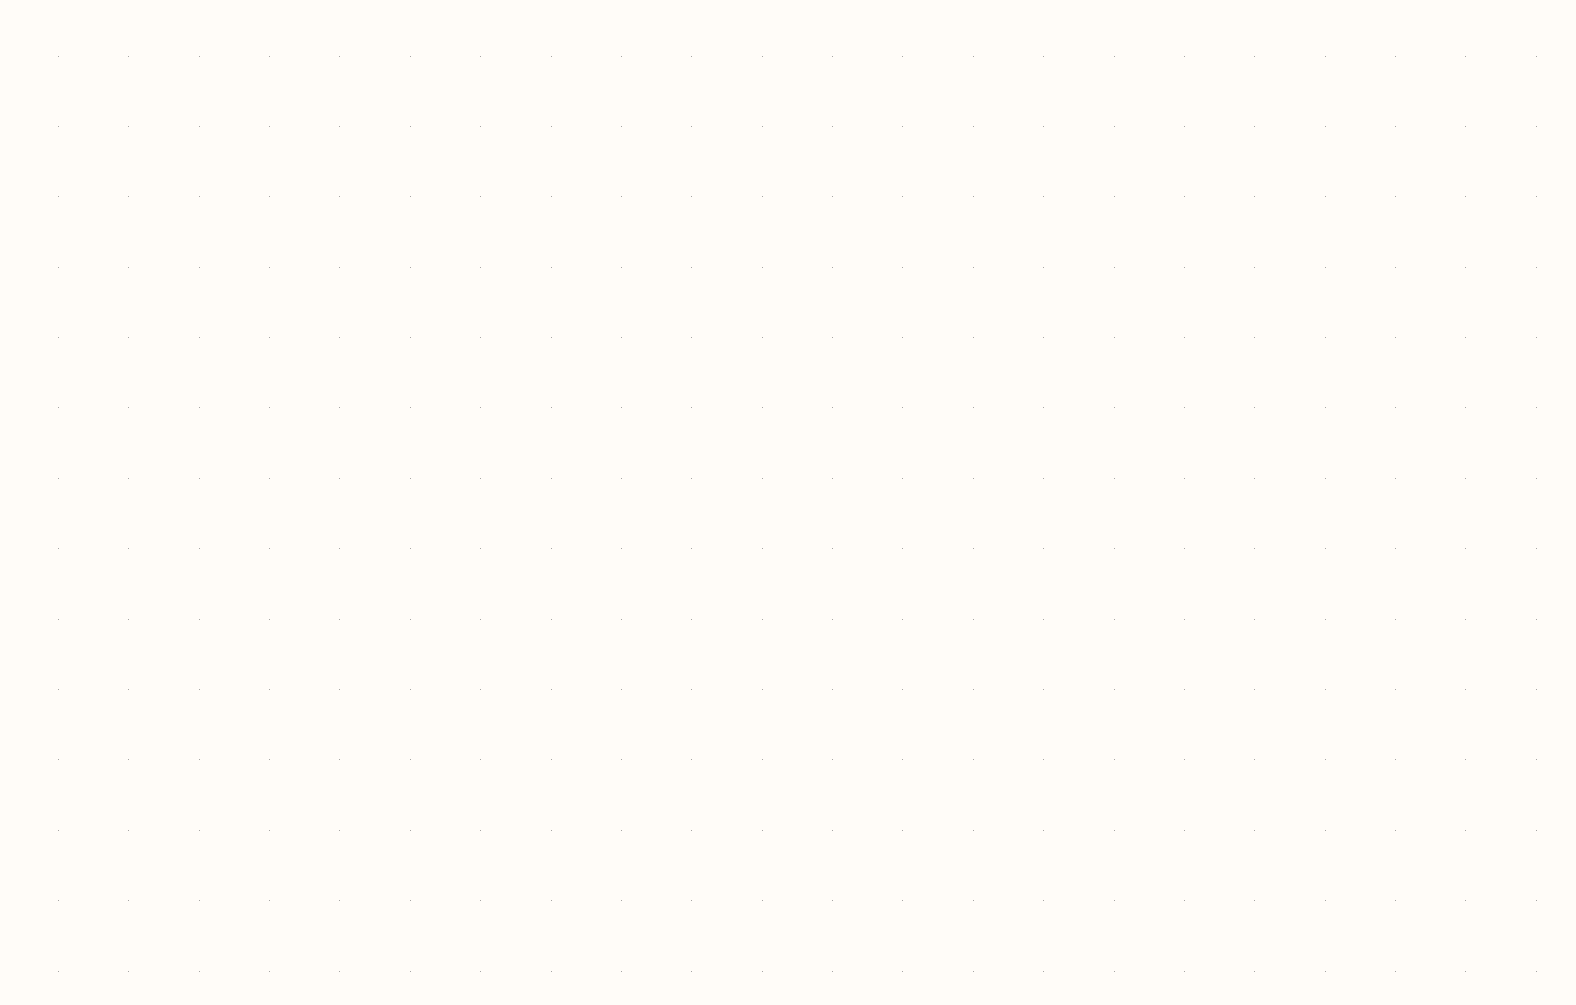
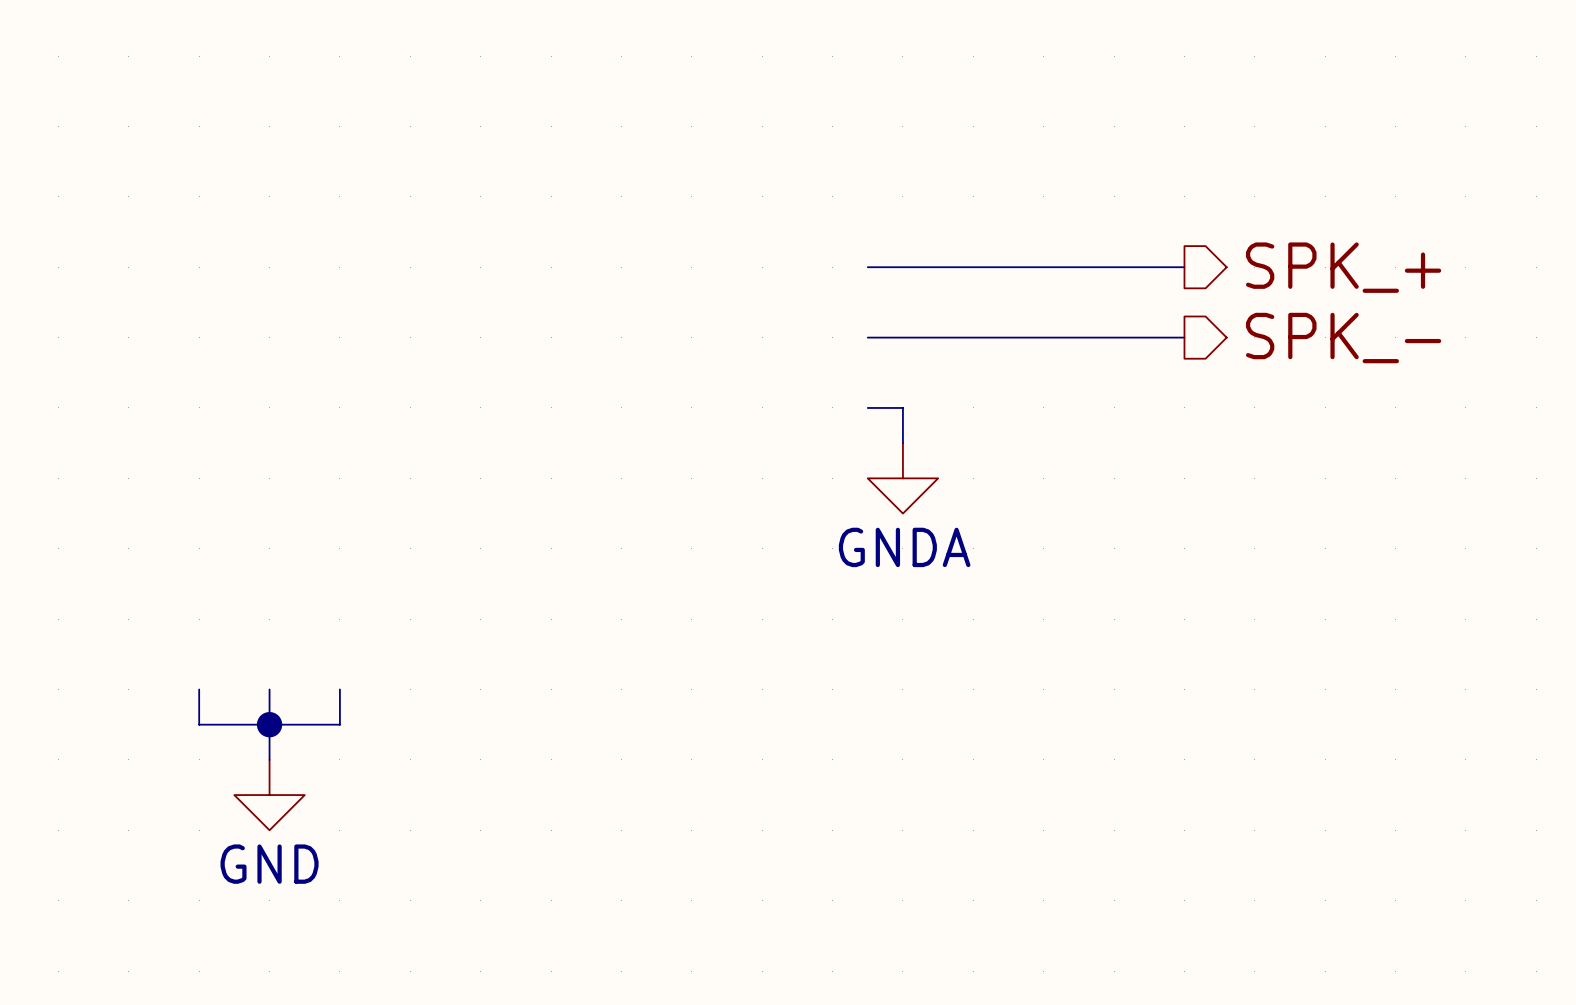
wire: none -> (867, 267) (1184, 267)
hierarchical label: none -> SPK_+ (1343, 267)
wire: none -> (867, 337) (1184, 337)
hierarchical label: none -> SPK_- (1343, 338)
wire: none -> (867, 407) (902, 407) (902, 443)
power symbol: none -> GNDA (902, 478)
wire: none -> (199, 689) (199, 724) (339, 724) (339, 689)
wire: none -> (269, 689) (269, 759)
junction: none -> (269, 724)
power symbol: none -> GND (269, 795)

